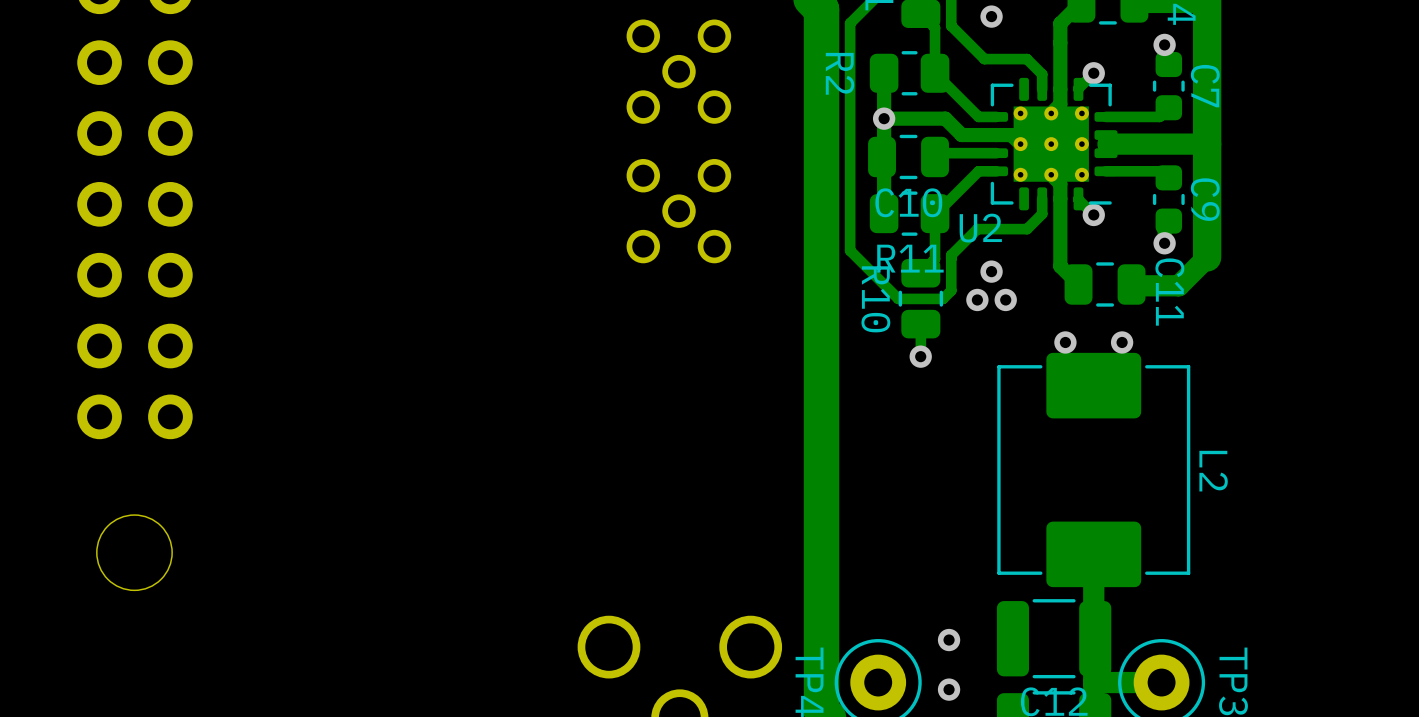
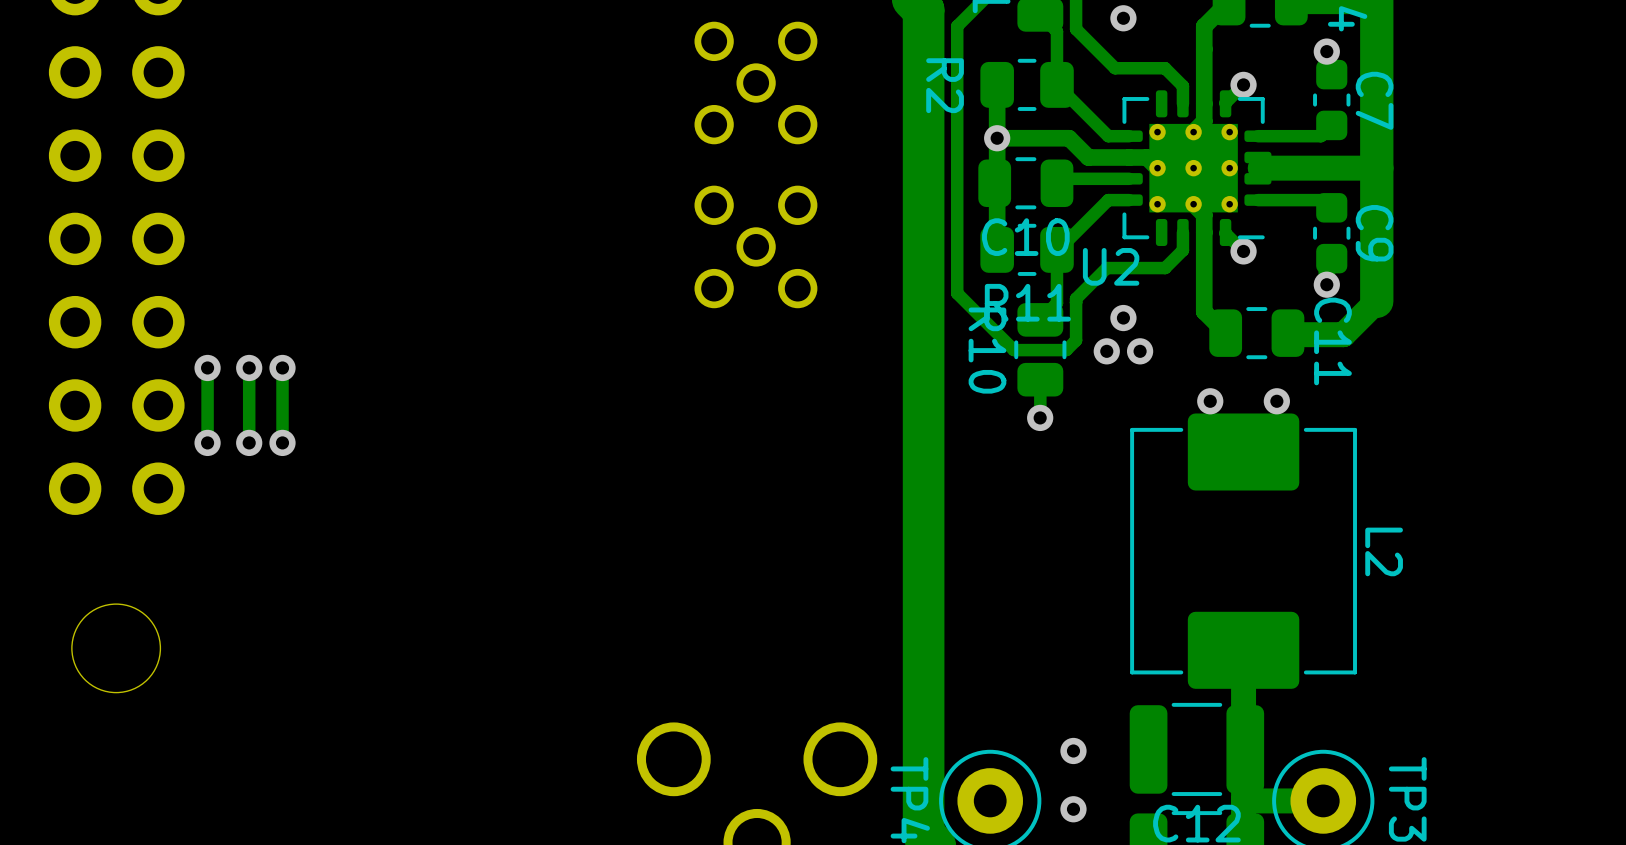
track: none -> (207, 367) (207, 442)
via: none -> (207, 367)
track: none -> (249, 367) (249, 442)
via: none -> (249, 367)
track: none -> (282, 367) (282, 442)
via: none -> (282, 367)
via: none -> (207, 442)
via: none -> (249, 442)
via: none -> (282, 442)

